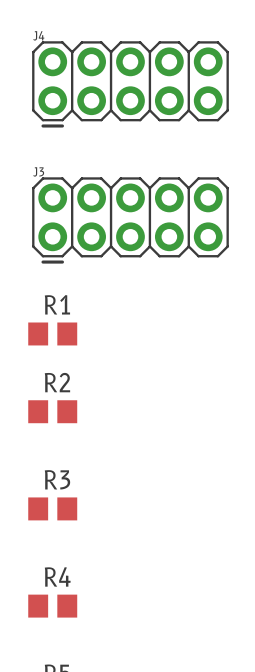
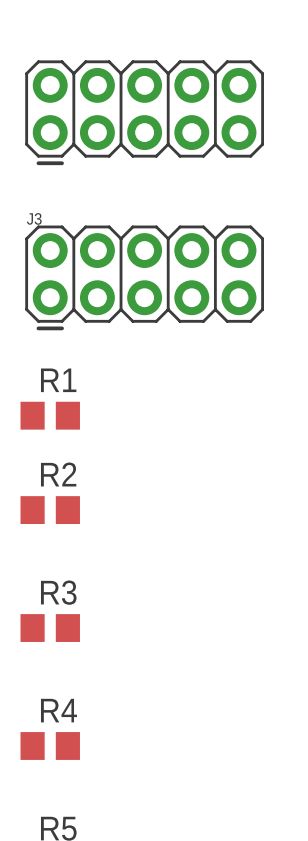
J4 name: J4 (38, 35) -> none

